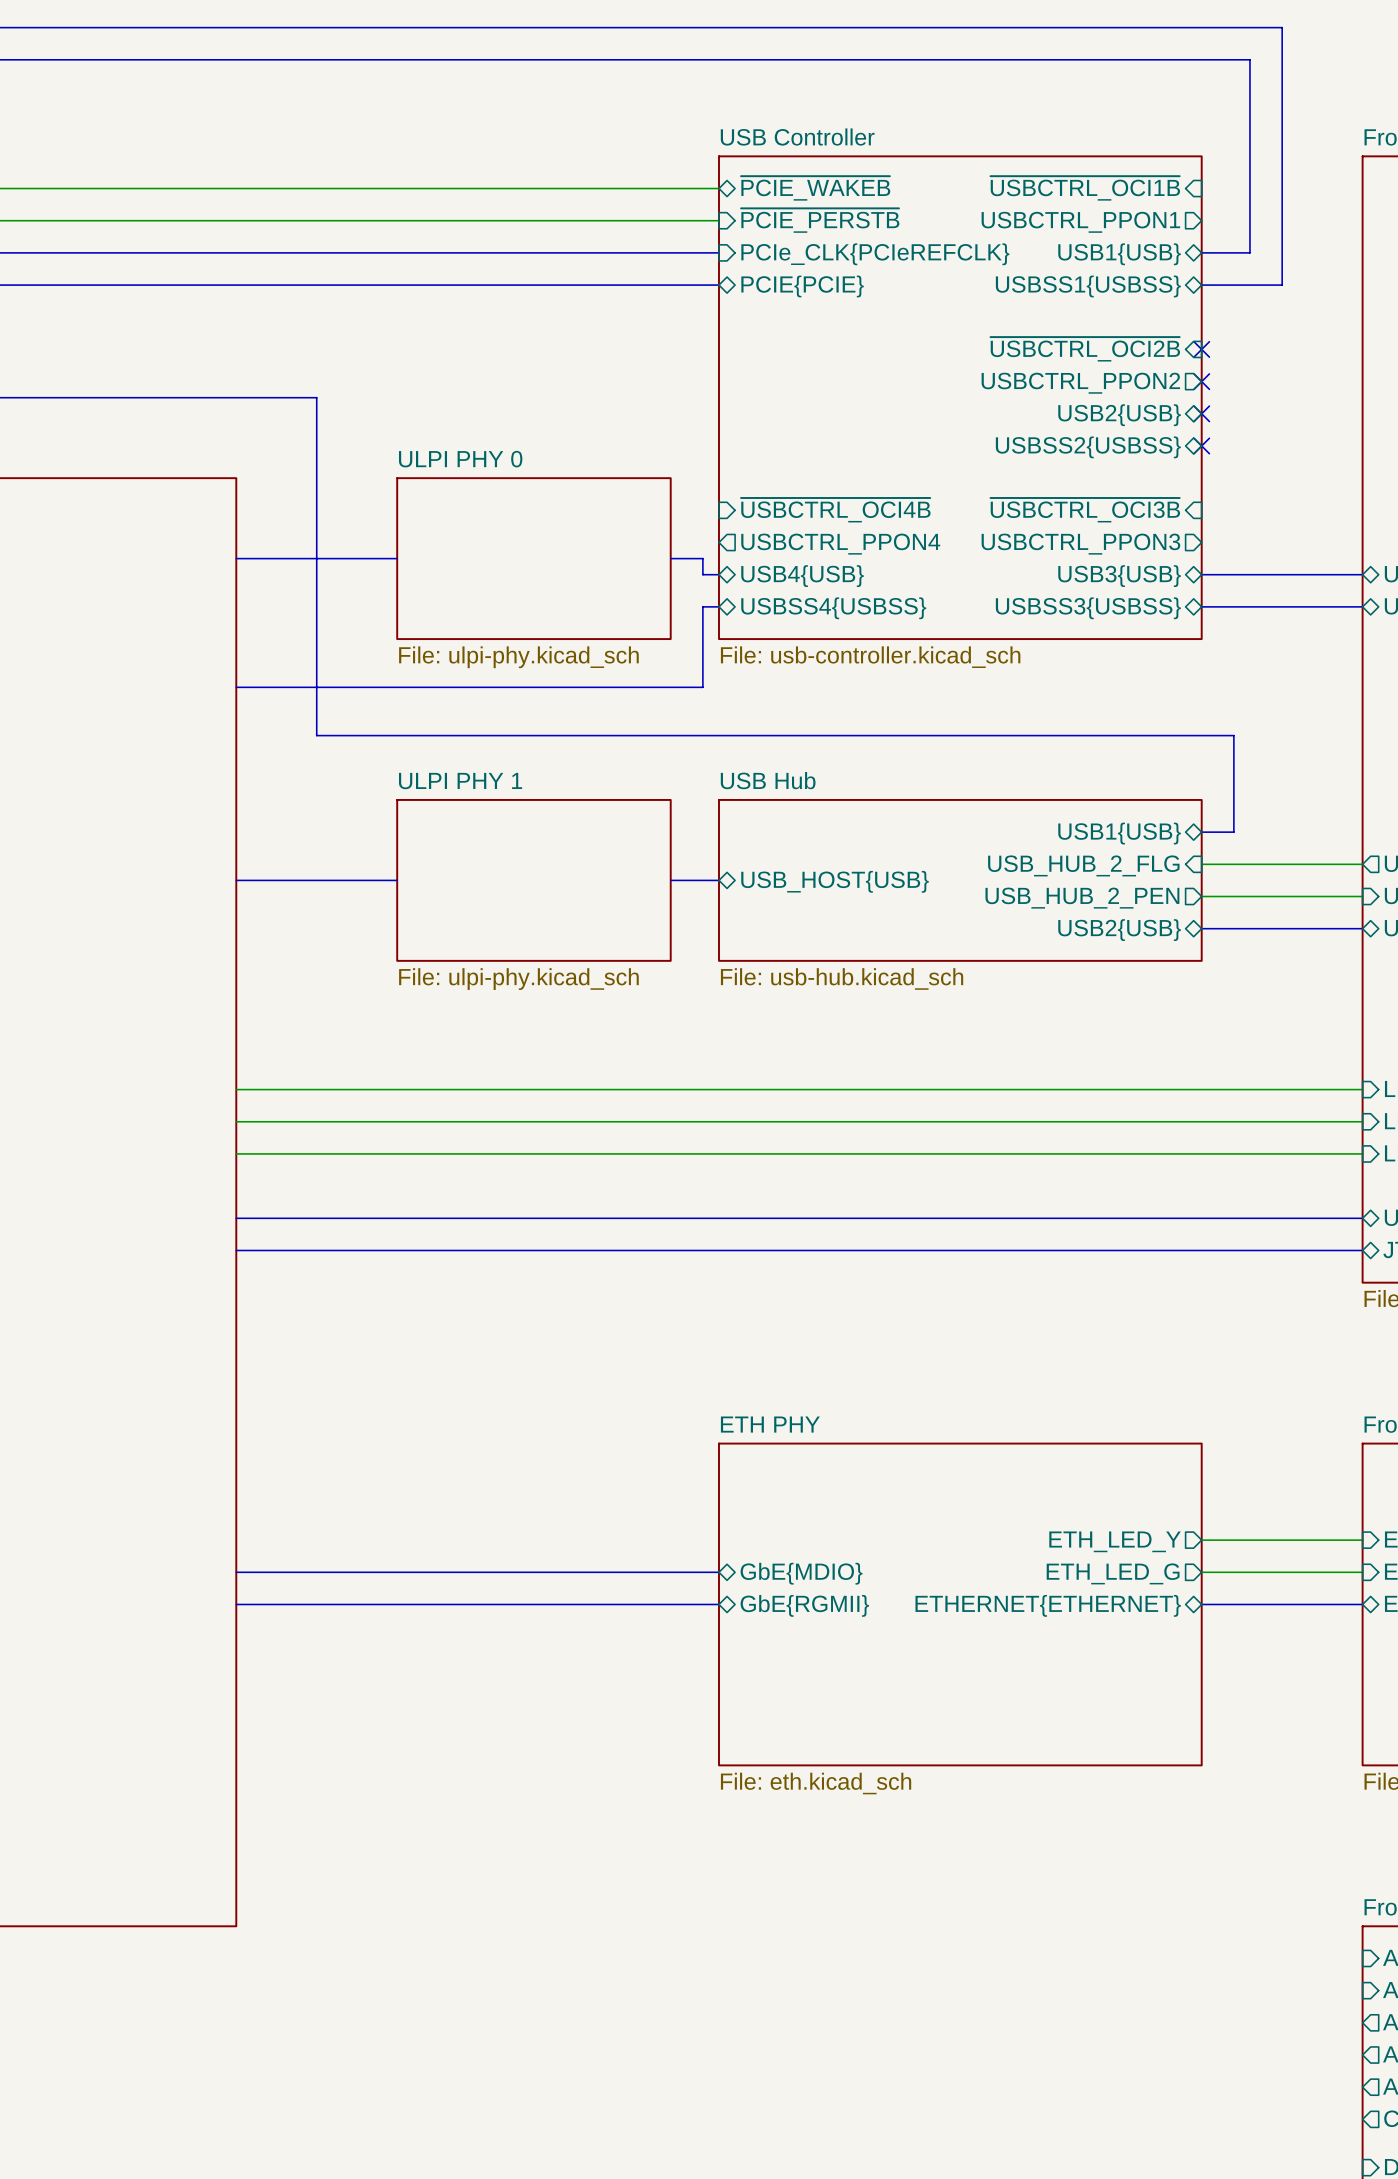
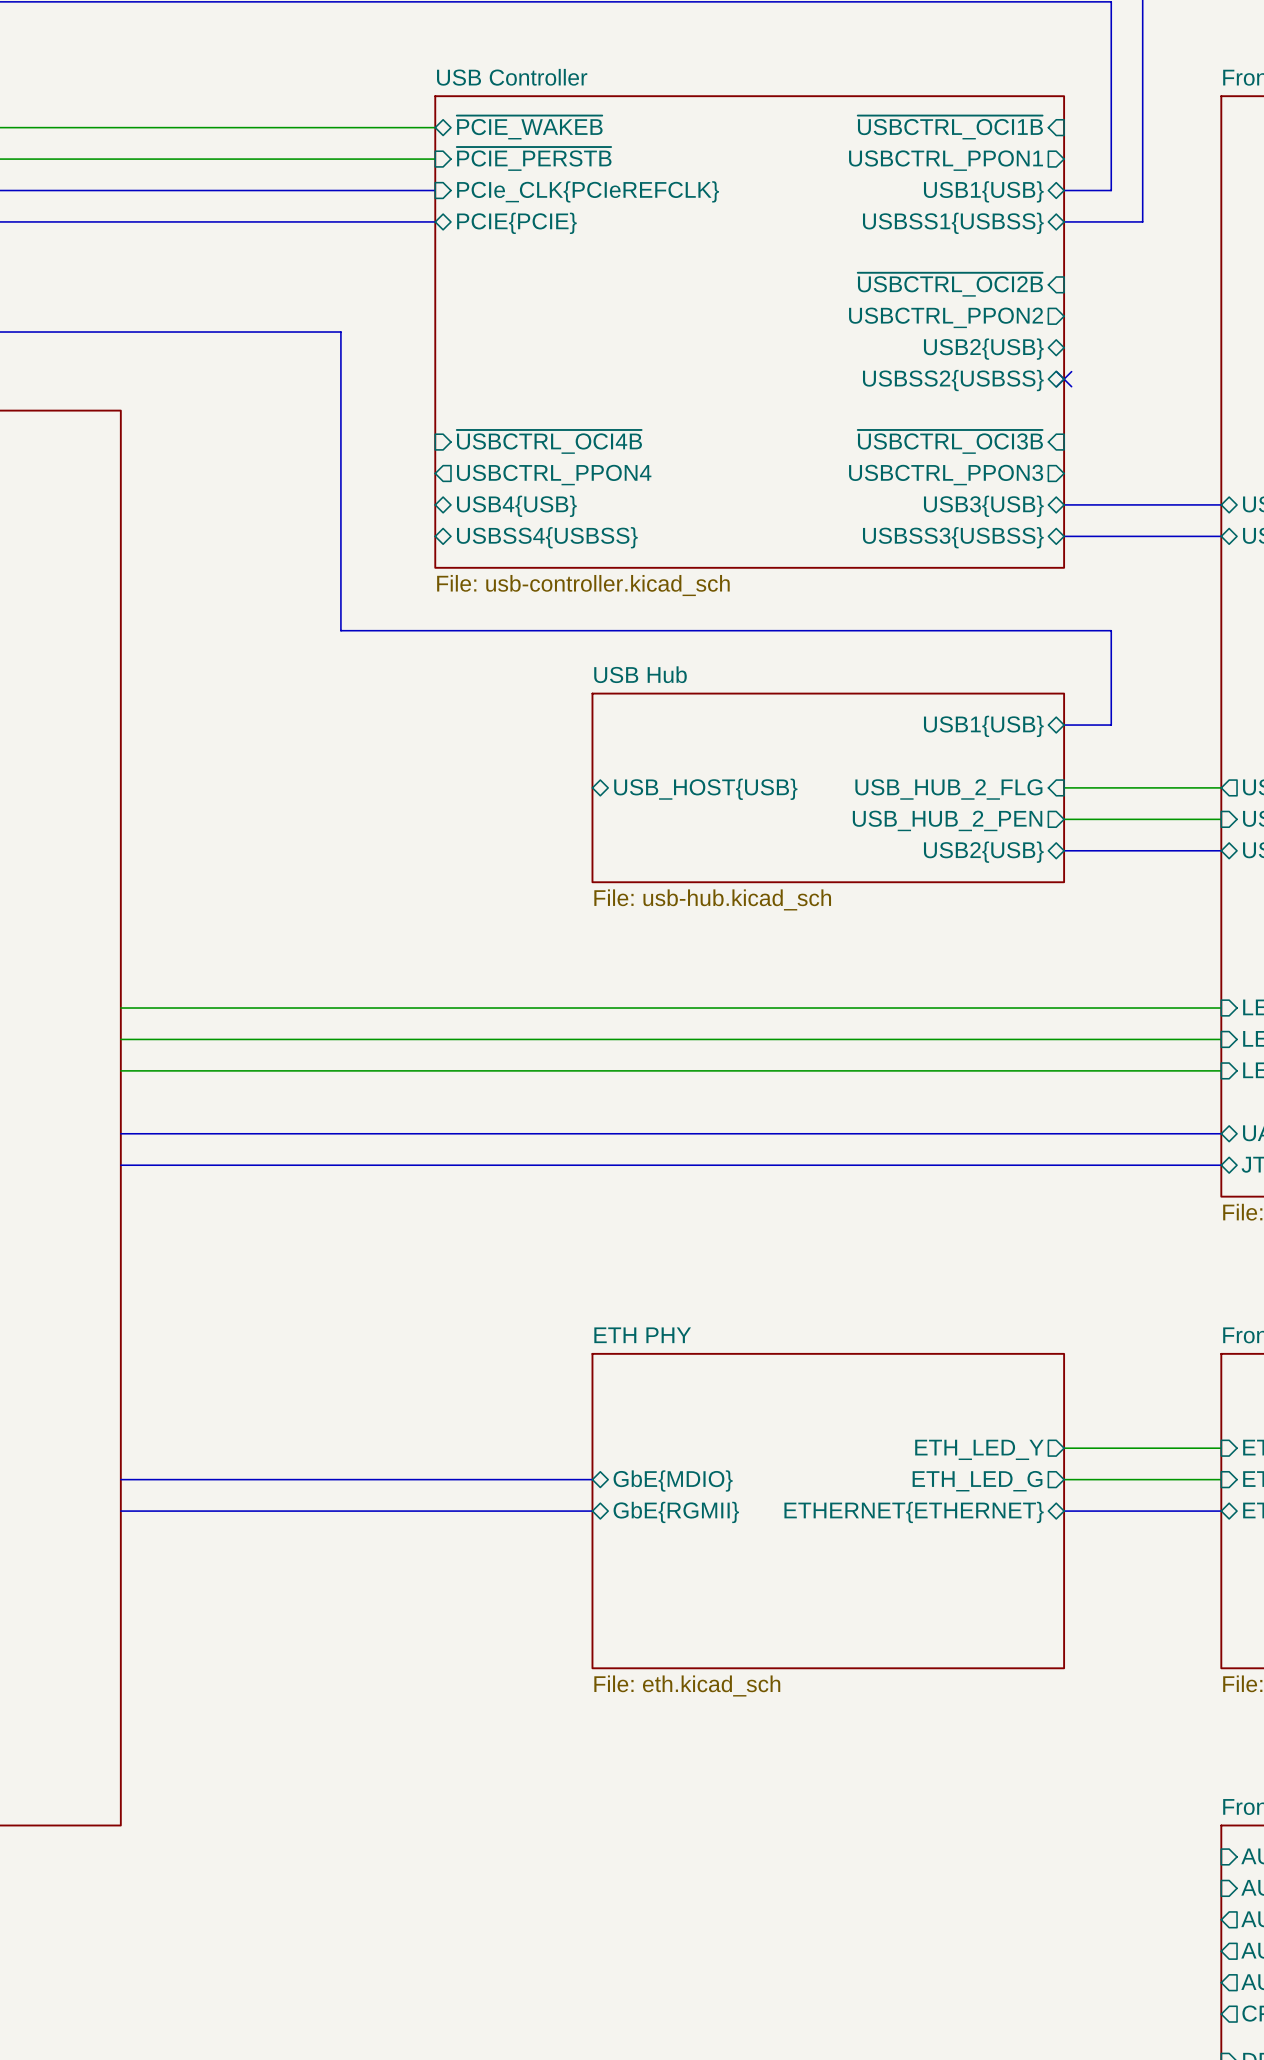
wire: (558, 188) (718, 188) -> none
sheet pin position: ~{PCIE_WAKEB} (815, 188) -> ~{PCIE_WAKEB} (529, 127)
wire: (558, 220) (718, 220) -> none
sheet pin position: ~{PCIE_PERSTB} (820, 220) -> ~{PCIE_PERSTB} (534, 158)
bus: (558, 252) (718, 252) -> none
sheet pin position: PCIe_CLK{PCIeREFCLK} (875, 254) -> PCIe_CLK{PCIeREFCLK} (588, 191)
bus: (558, 285) (718, 285) -> none
sheet pin position: PCIE{PCIE} (802, 286) -> PCIE{PCIE} (516, 223)
no-connect mark: (1201, 349) -> none
no-connect mark: (1201, 381) -> none
bus: (316, 397) (316, 735) (1233, 735) (1233, 832) (1201, 832) -> (199, 332) (340, 332) (340, 630) (1111, 630) (1111, 725) (1064, 725)
sheet USB Controller: none -> File: usb-controller.kicad_sch (749, 332)
sheet USB Controller: File: usb-controller.kicad_sch (960, 397) -> none
no-connect mark: (1201, 413) -> none
sheet pin position: ~{USBCTRL_OCI4B} (835, 510) -> ~{USBCTRL_OCI4B} (549, 441)
sheet pin position: USBCTRL_PPON4 (840, 544) -> USBCTRL_PPON4 (554, 475)
bus: (236, 558) (397, 558) -> none
sheet ULPI PHY 0: File: ulpi-phy.kicad_sch (533, 558) -> none
bus: (670, 558) (702, 558) (702, 574) (718, 574) -> none
sheet pin position: USB4{USB} (802, 576) -> USB4{USB} (516, 506)
bus: (718, 606) (702, 606) (702, 687) (236, 687) -> none
sheet pin position: USBSS4{USBSS} (833, 608) -> USBSS4{USBSS} (547, 537)
sheet pin position: USB1{USB} (1119, 833) -> USB1{USB} (983, 726)
sheet USB Hub: none -> File: usb-hub.kicad_sch (828, 787)
bus: (236, 880) (397, 880) -> none
sheet ULPI PHY 1: File: ulpi-phy.kicad_sch (533, 880) -> none
bus: (670, 880) (718, 880) -> none
sheet USB Hub: File: usb-hub.kicad_sch (960, 880) -> none
sheet pin position: USB_HOST{USB} (835, 881) -> USB_HOST{USB} (705, 789)

